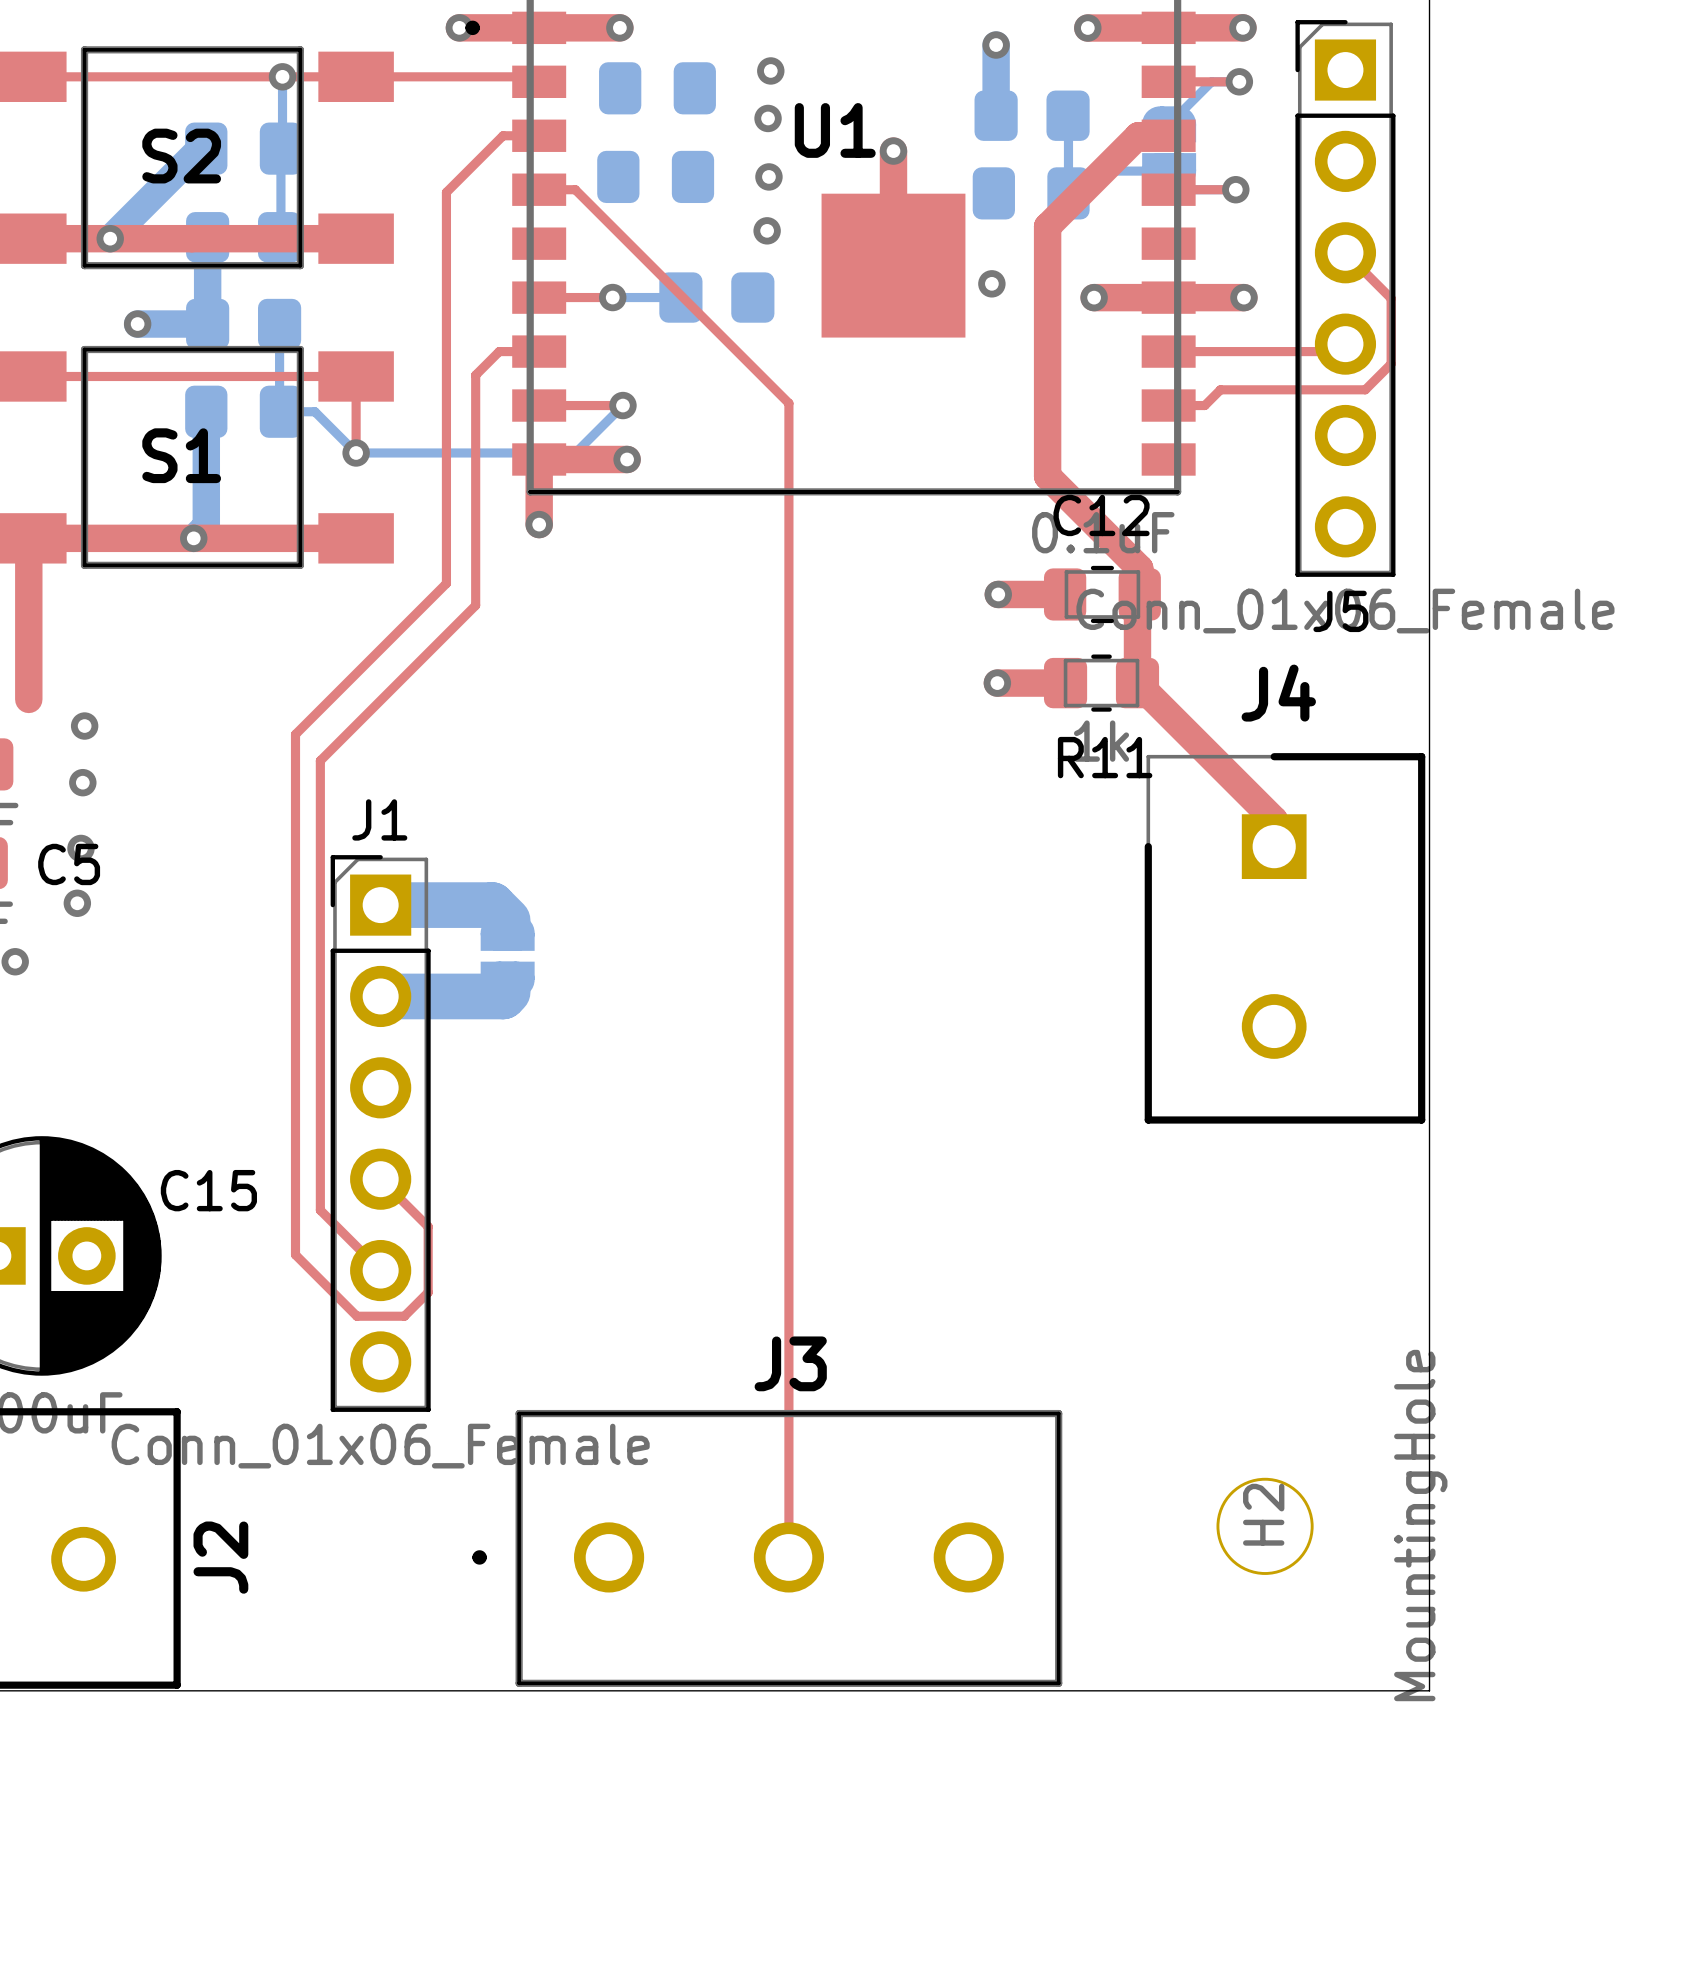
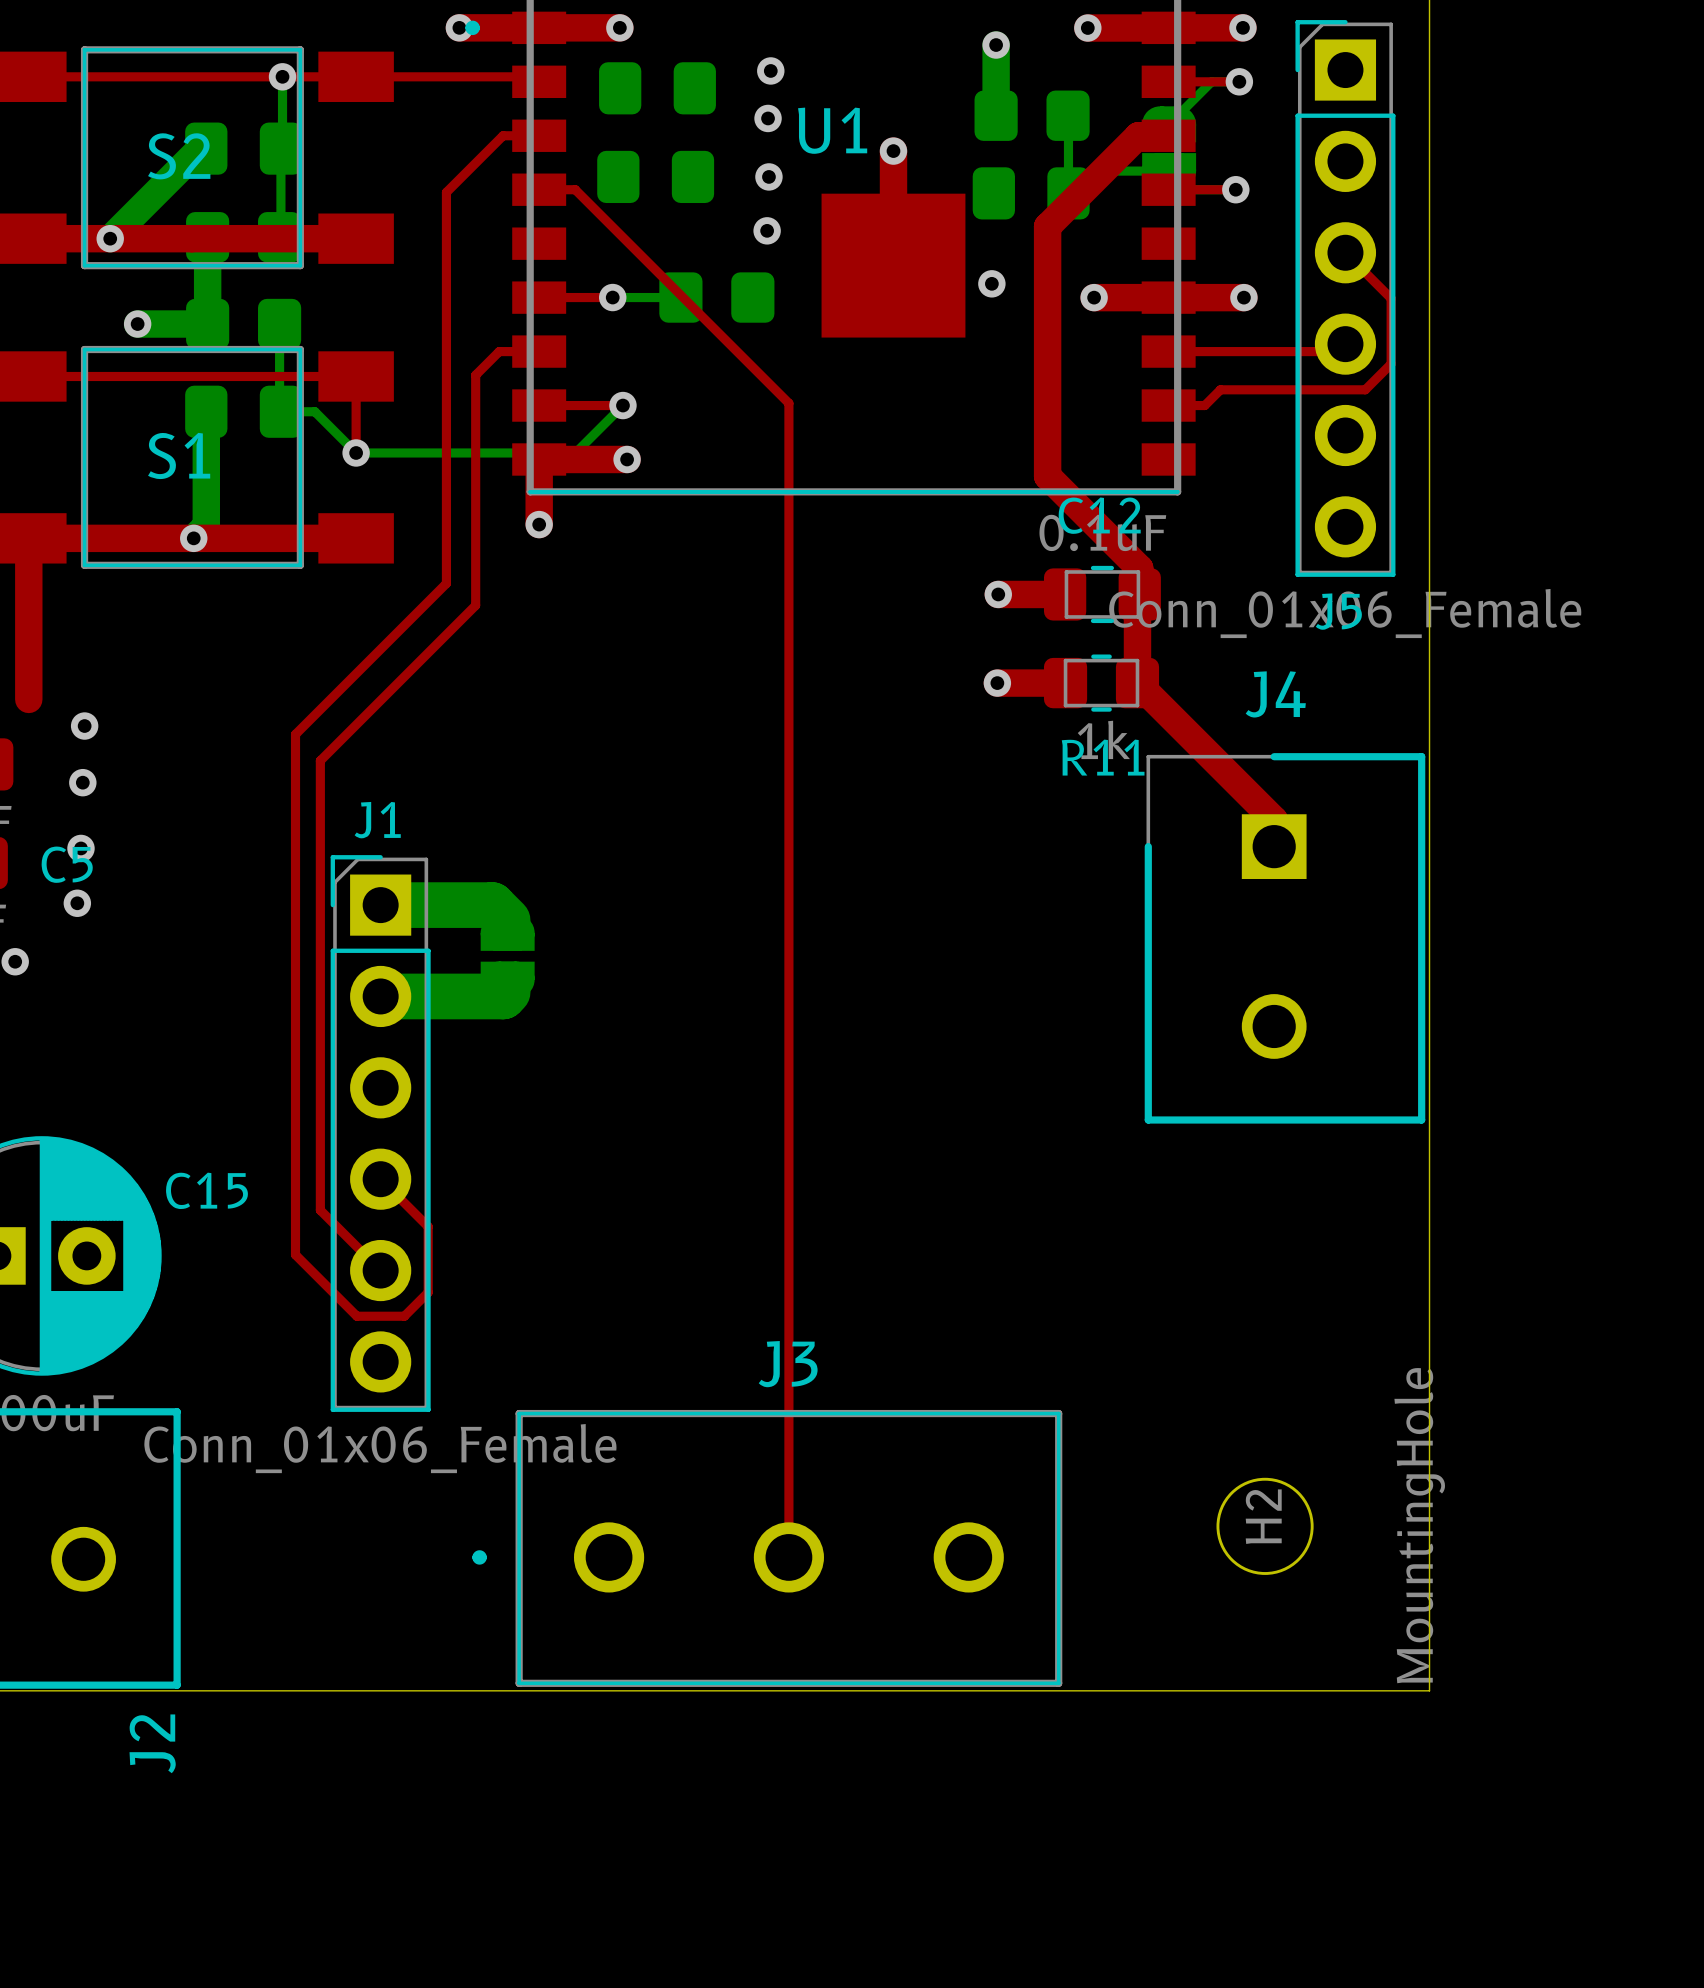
J2 name position: J2 (220, 1557) -> J2 (152, 1743)

